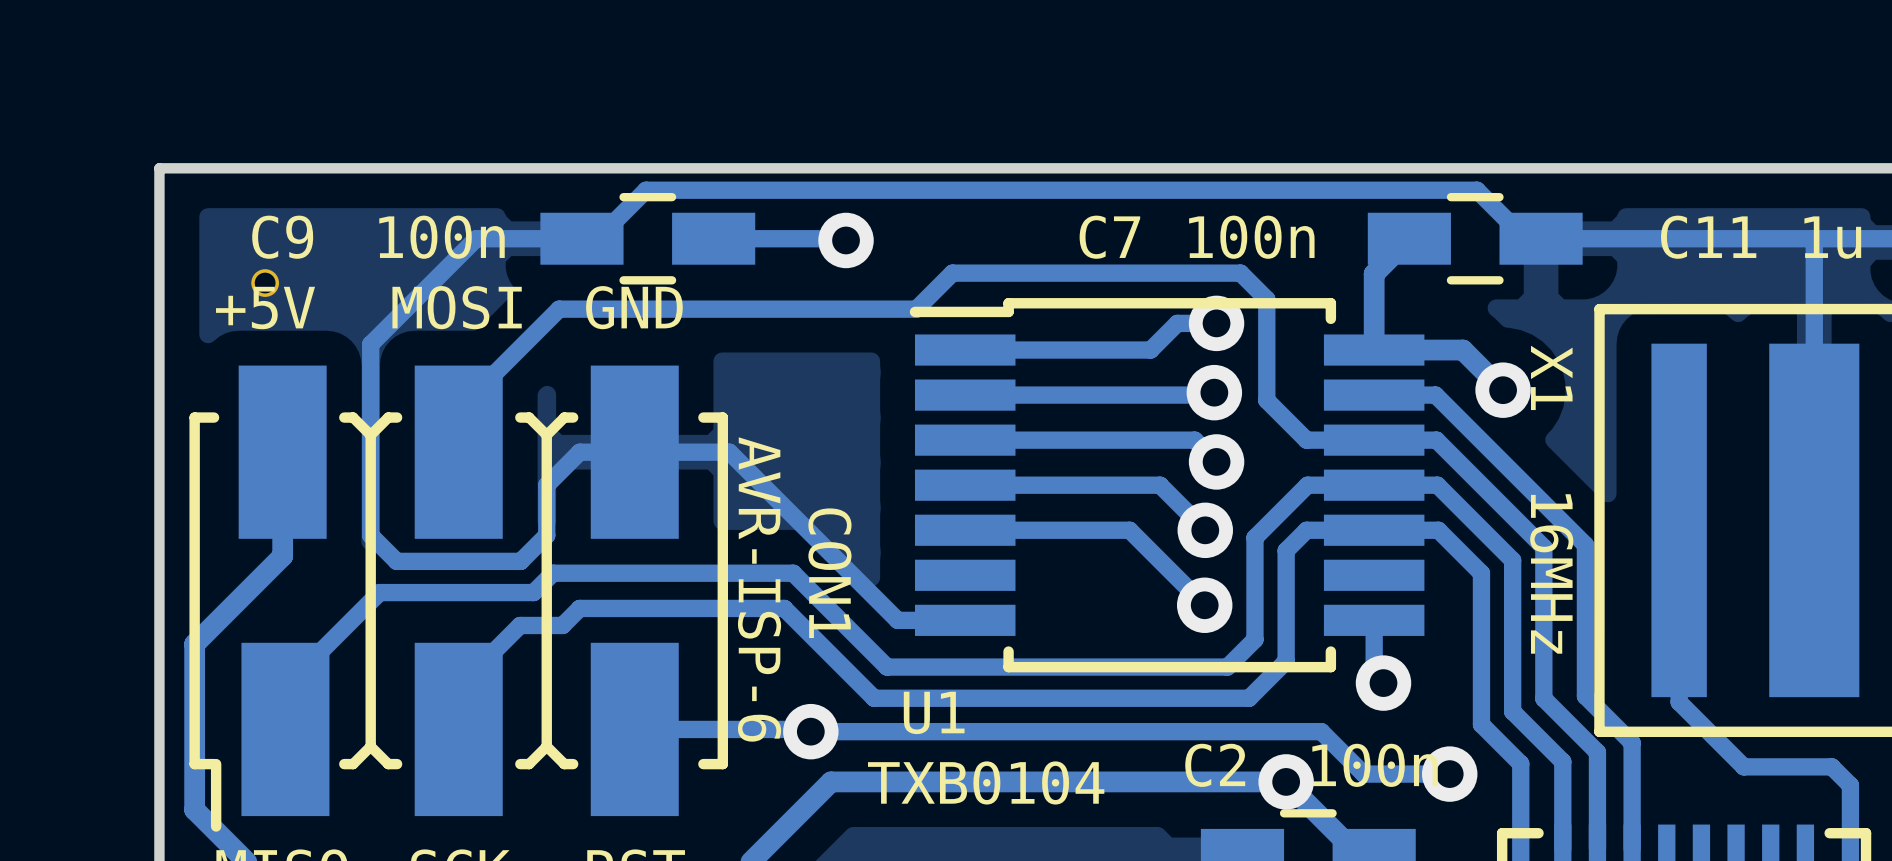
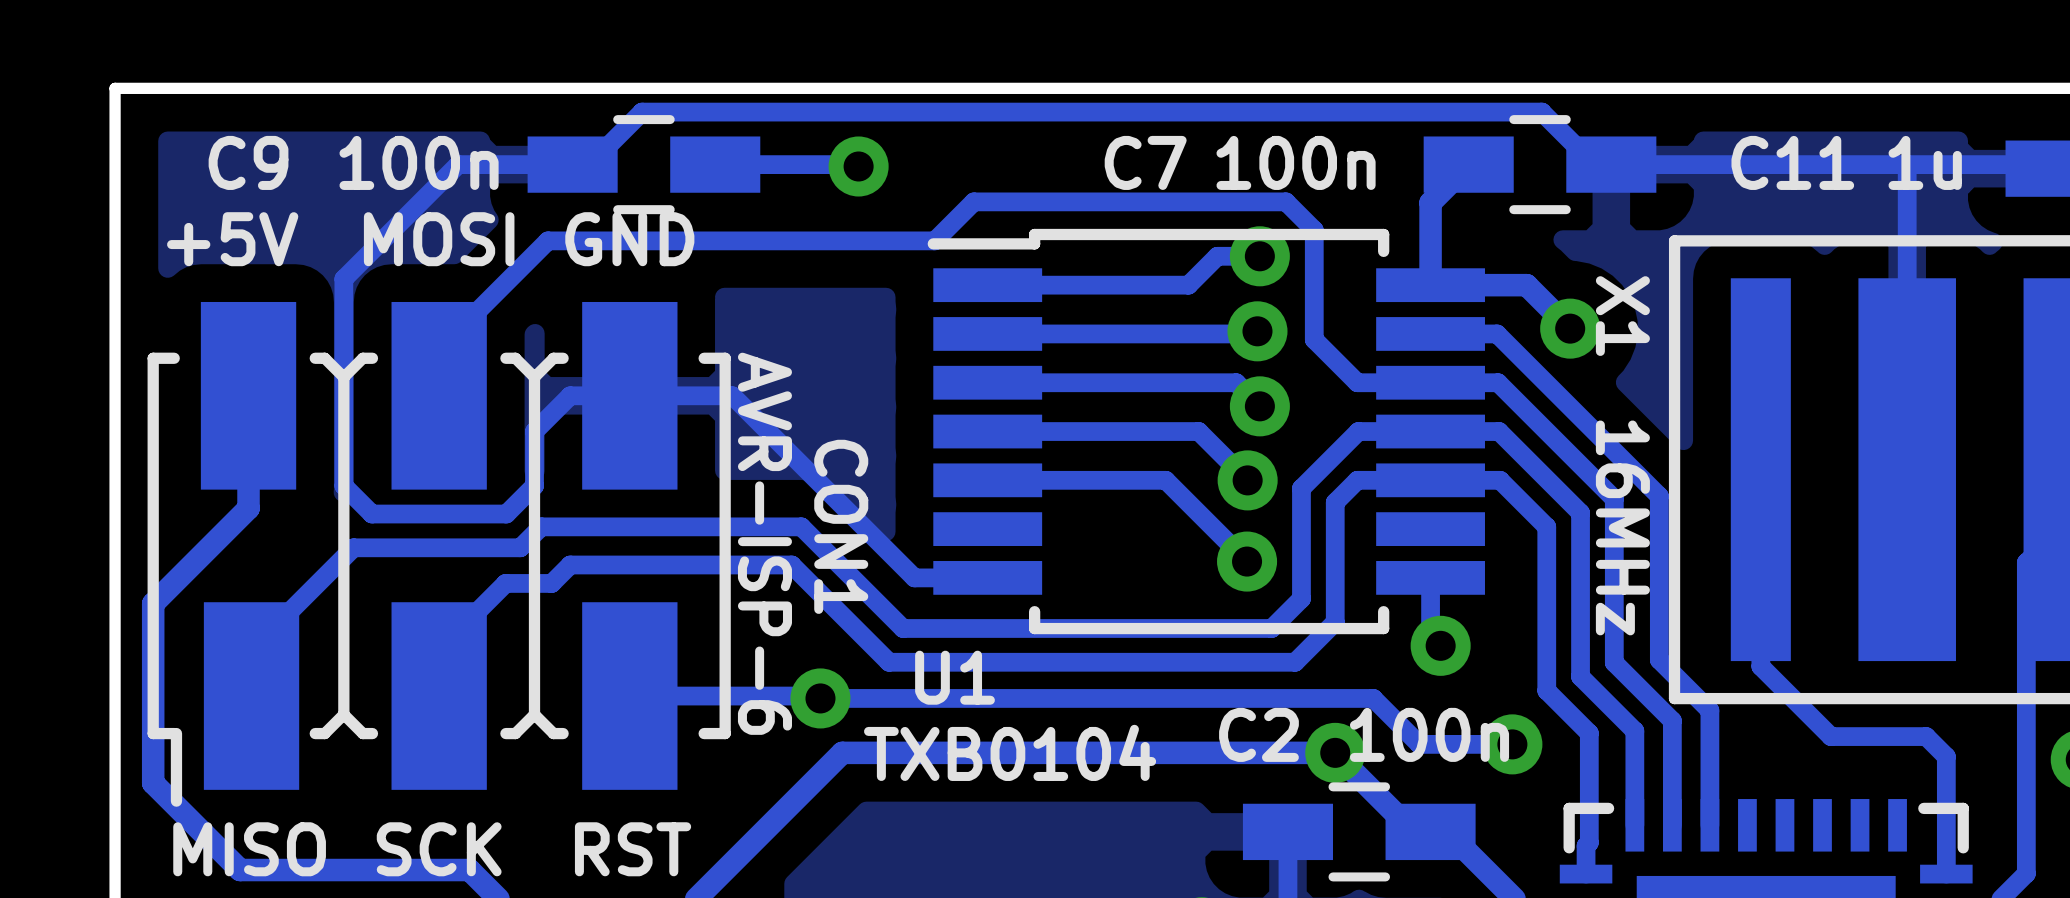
part: (265, 283) -> none

